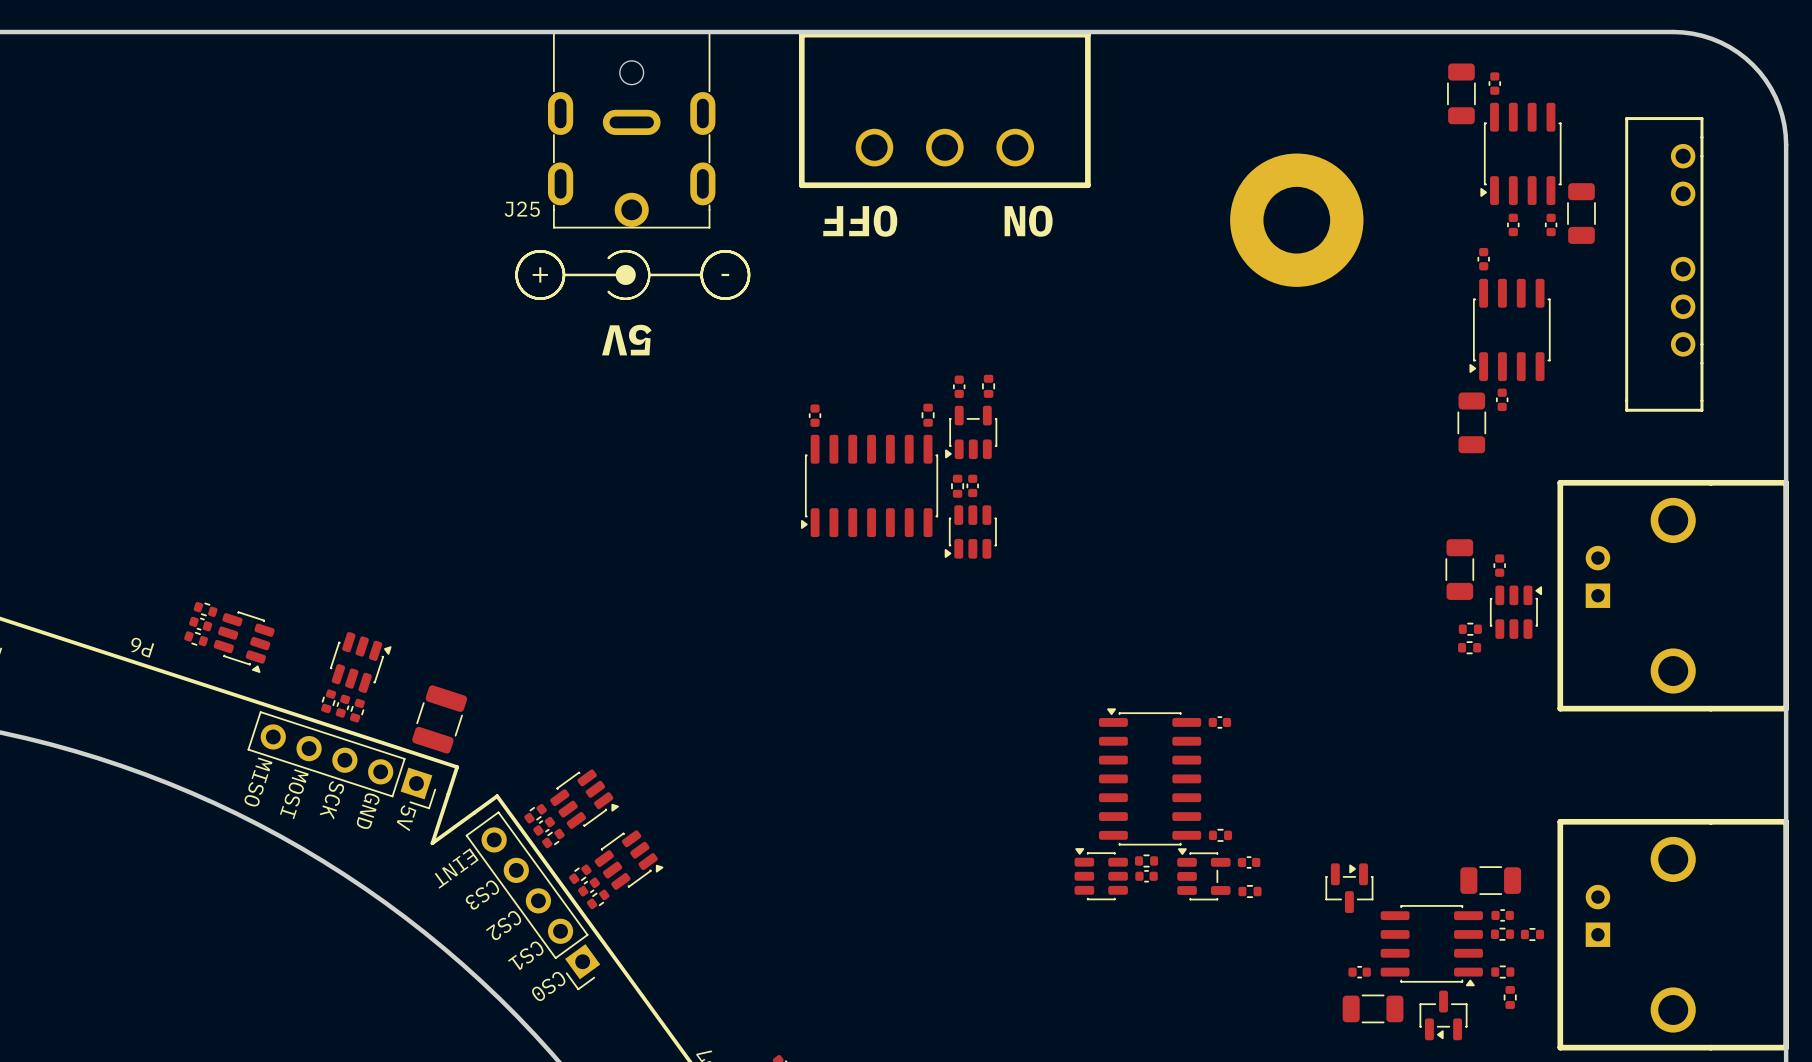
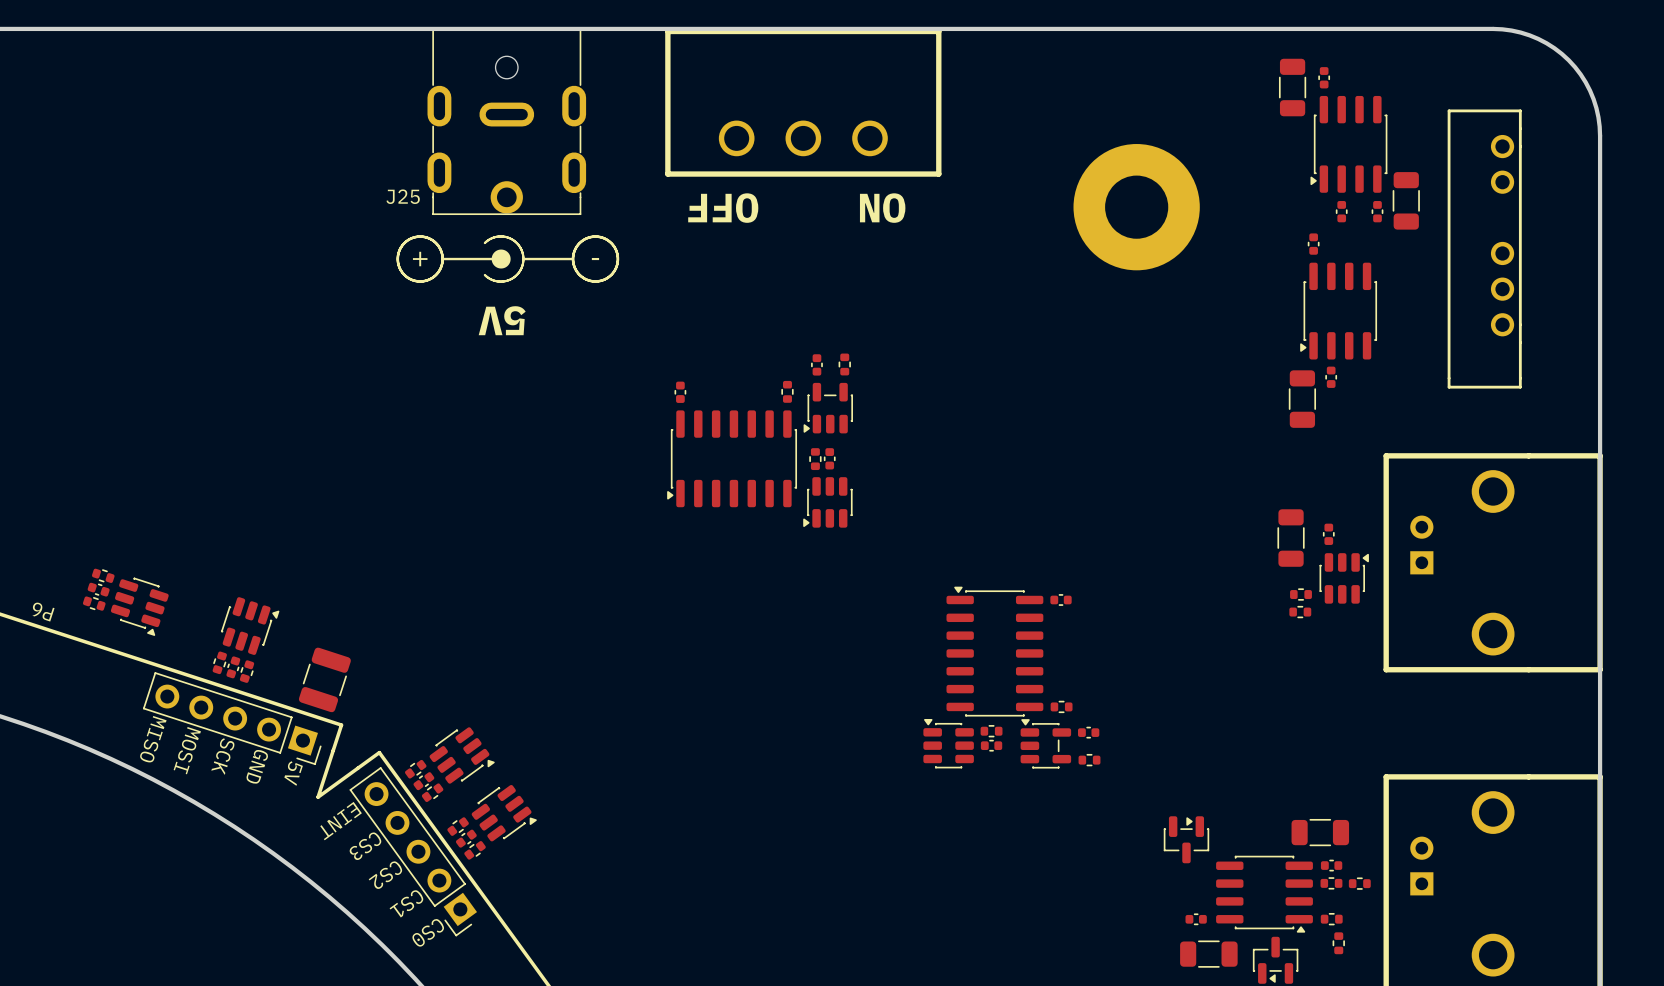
part: none -> (1061, 599)
part: (1219, 722) -> none
part: none -> (1061, 706)
part: none -> (991, 731)
part: none -> (1088, 732)
part position: (1150, 776) -> (994, 651)
part: none -> (991, 745)
part position: (1220, 835) -> (1089, 760)
part: (1146, 860) -> none
part: (1249, 862) -> none
part position: (1101, 874) -> (948, 743)
part position: (1203, 874) -> (1045, 743)
part: (1146, 876) -> none
part: (1249, 891) -> none

